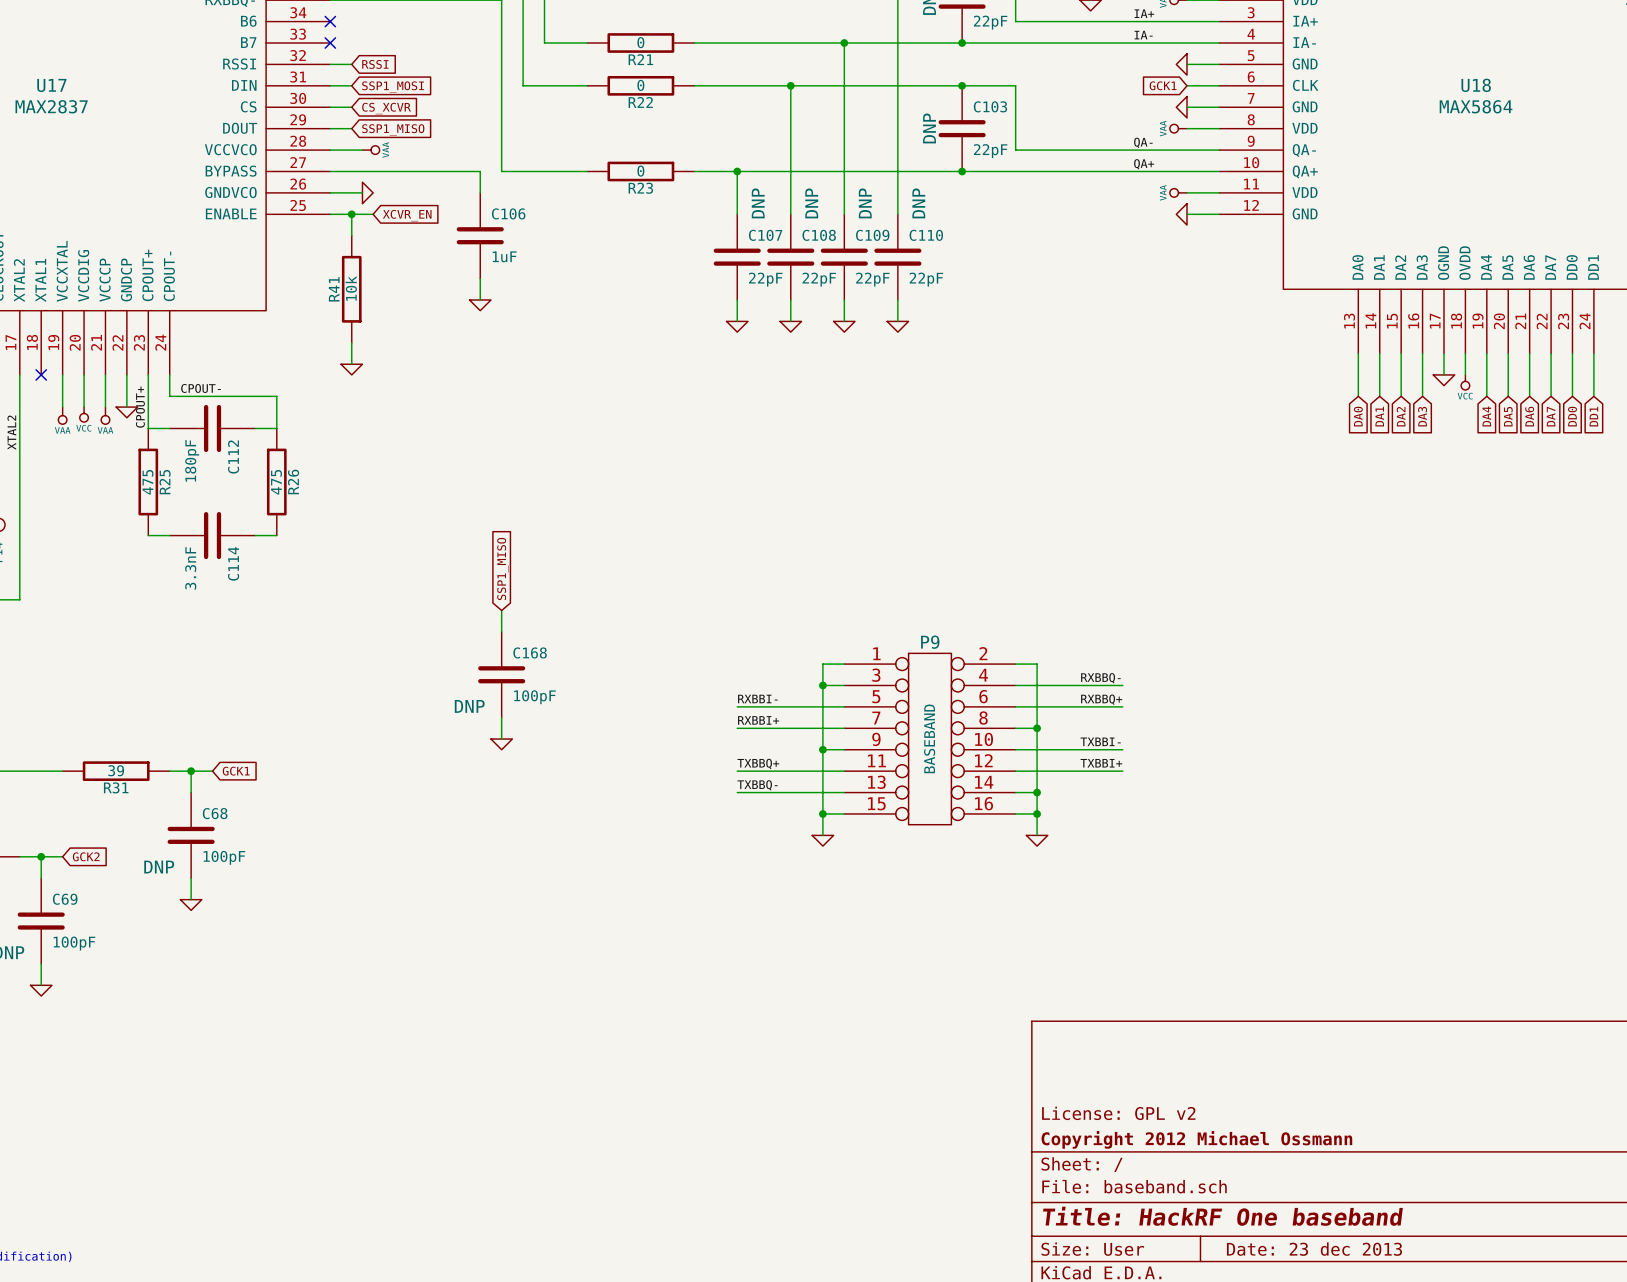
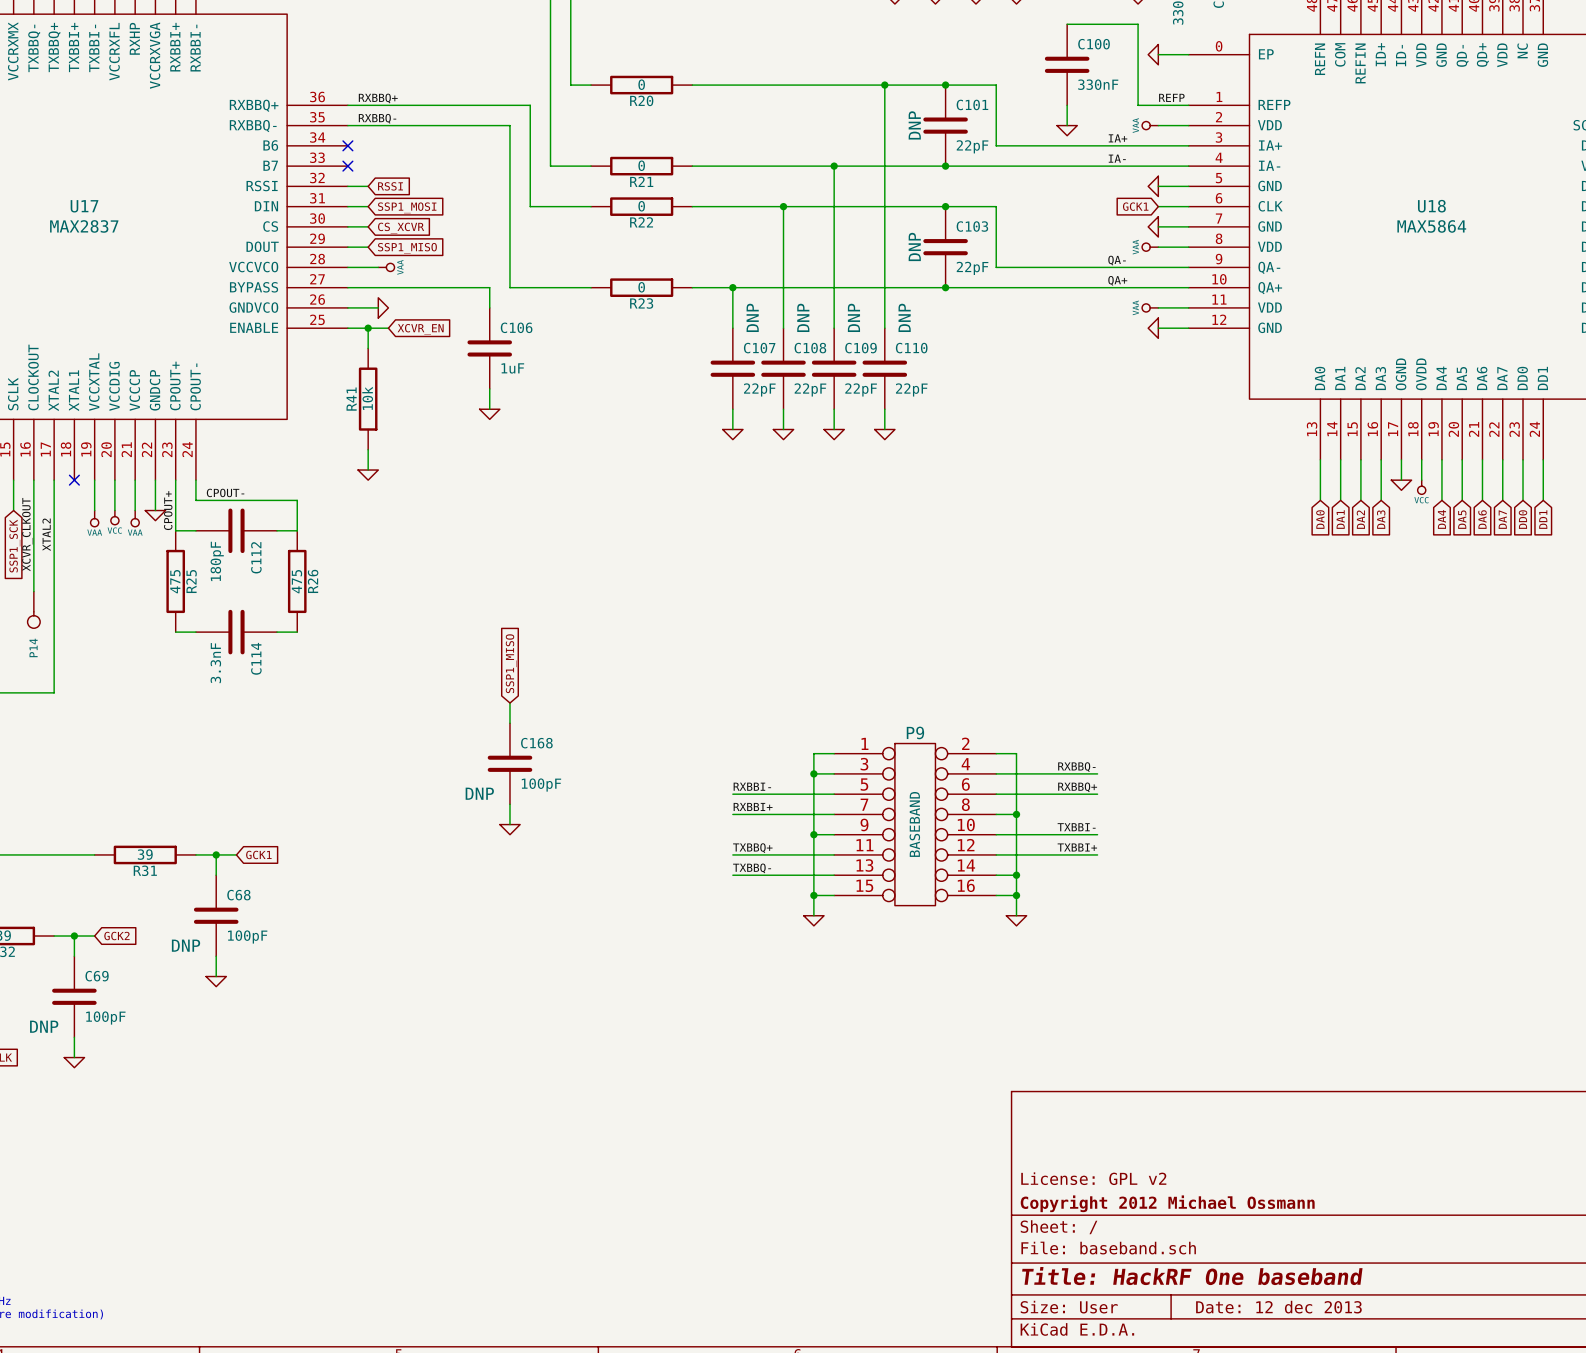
title block: Date: 23 dec 2013 (1314, 1249) -> Date: 12 dec 2013 (1278, 1307)

